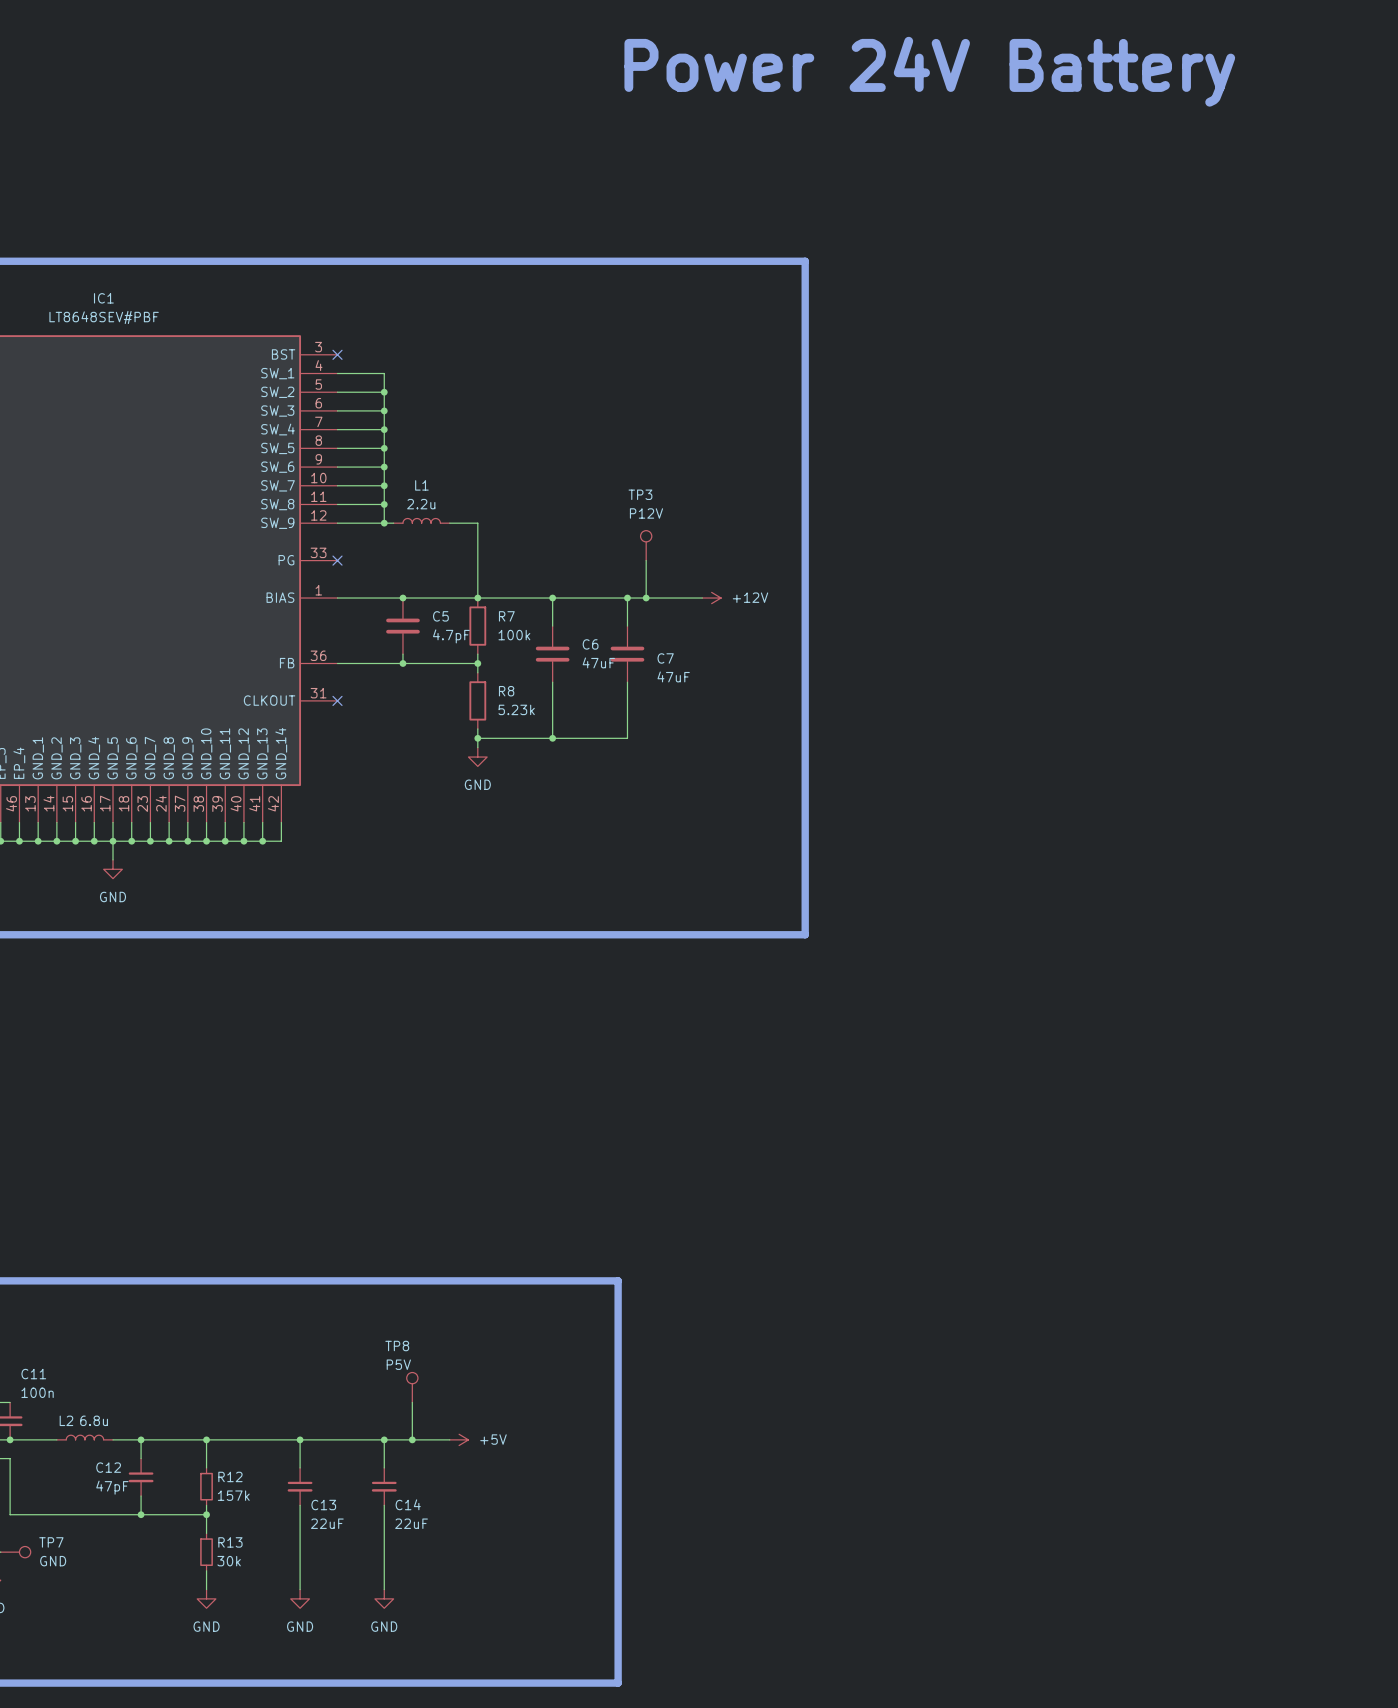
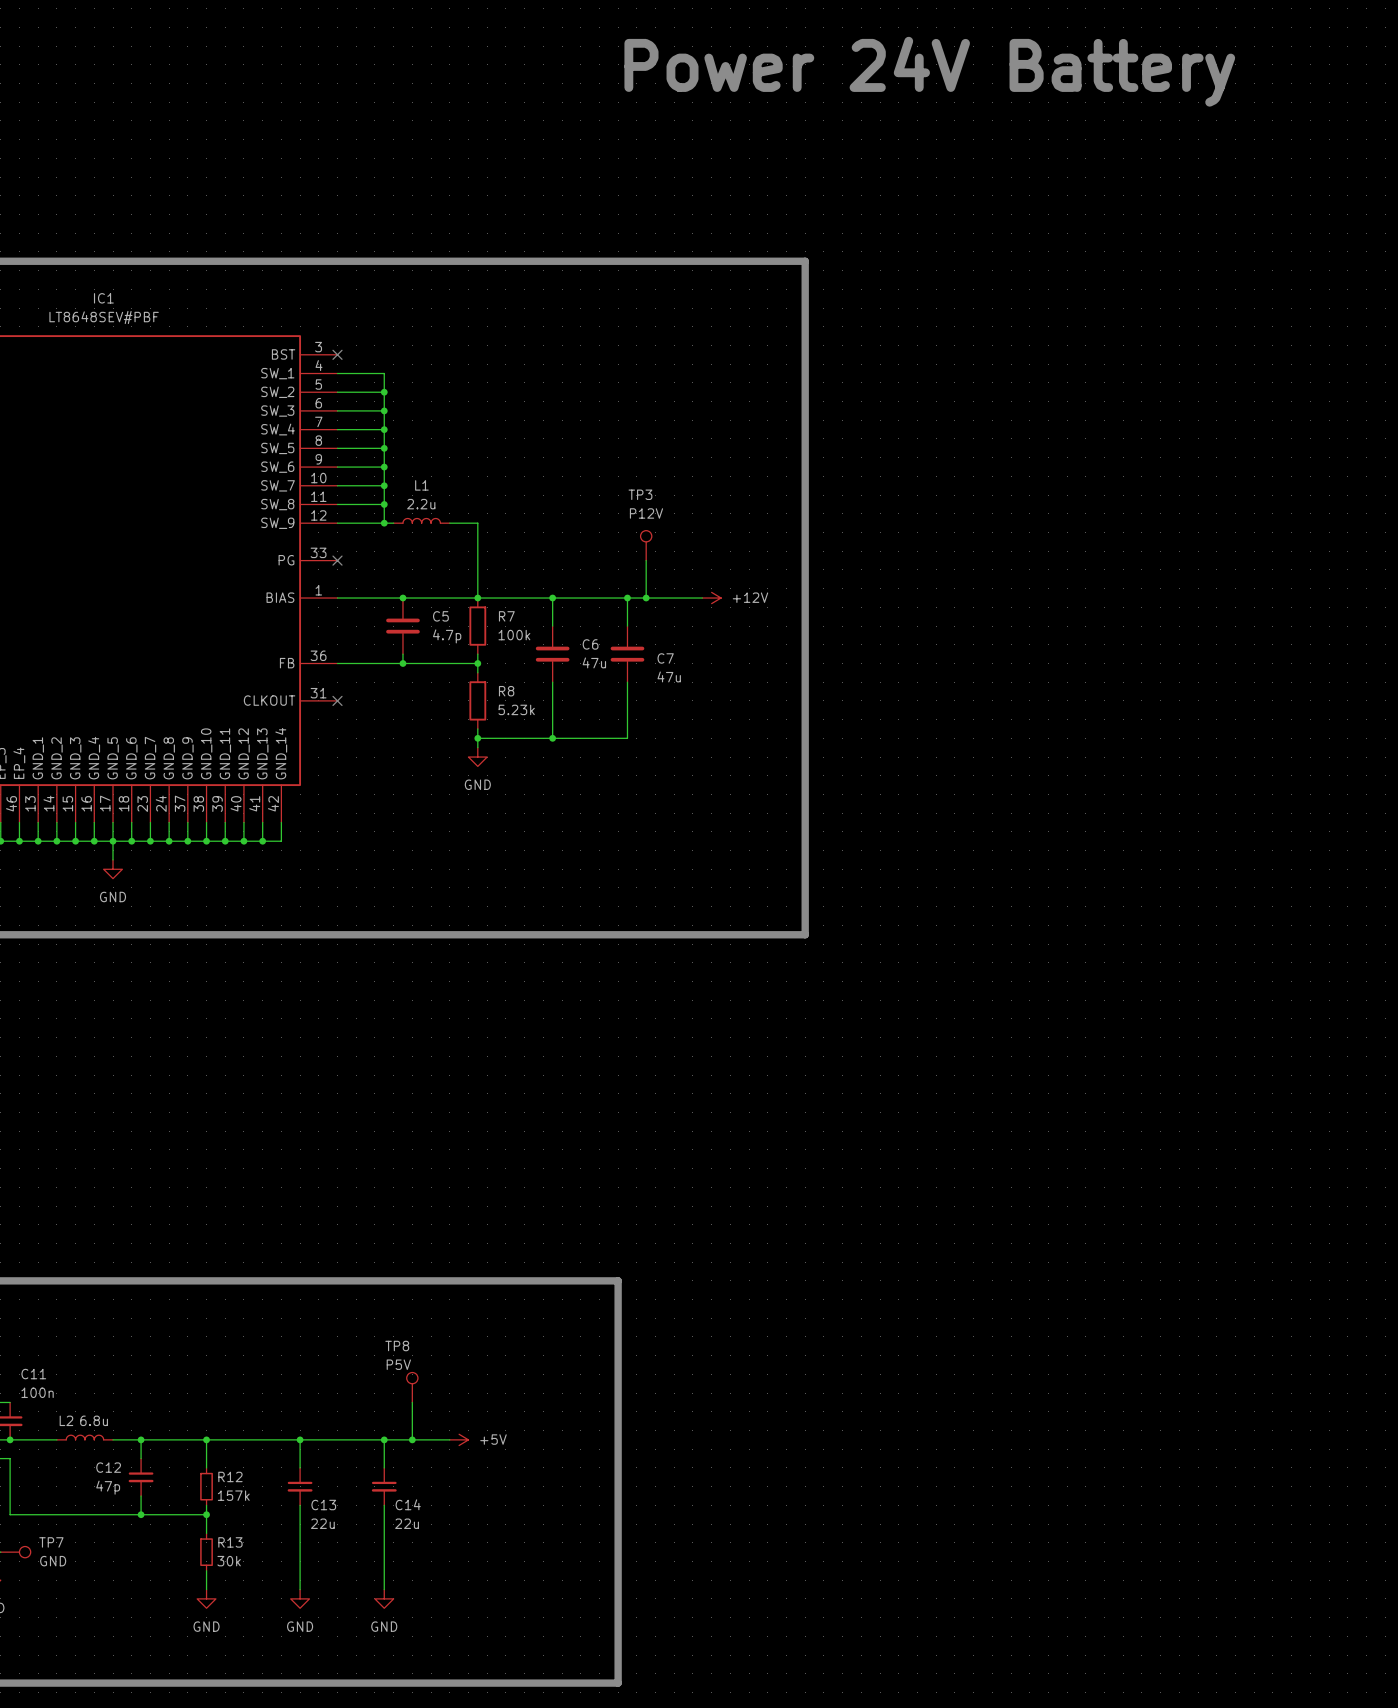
C5 value: 4.7pF (451, 636) -> 4.7p (447, 636)
C6 value: 47uF (598, 662) -> 47u (594, 662)
C7 value: 47uF (673, 676) -> 47u (669, 676)
C12 value: 47pF (112, 1487) -> 47p (108, 1487)
C13 value: 22uF (327, 1523) -> 22u (322, 1523)
C14 value: 22uF (411, 1523) -> 22u (407, 1523)

